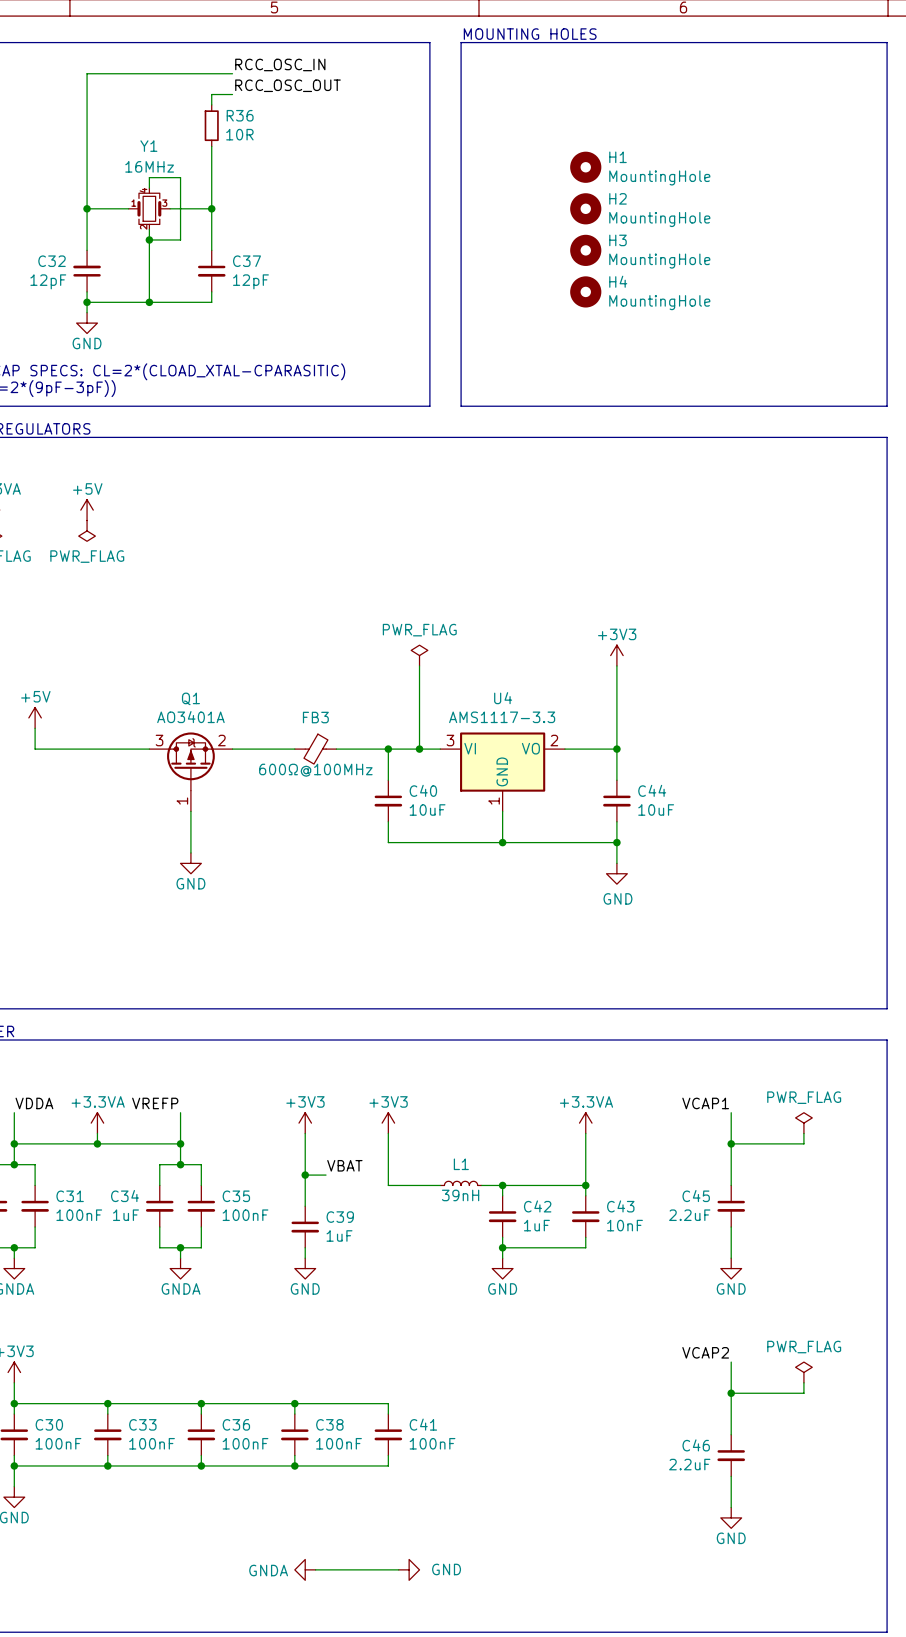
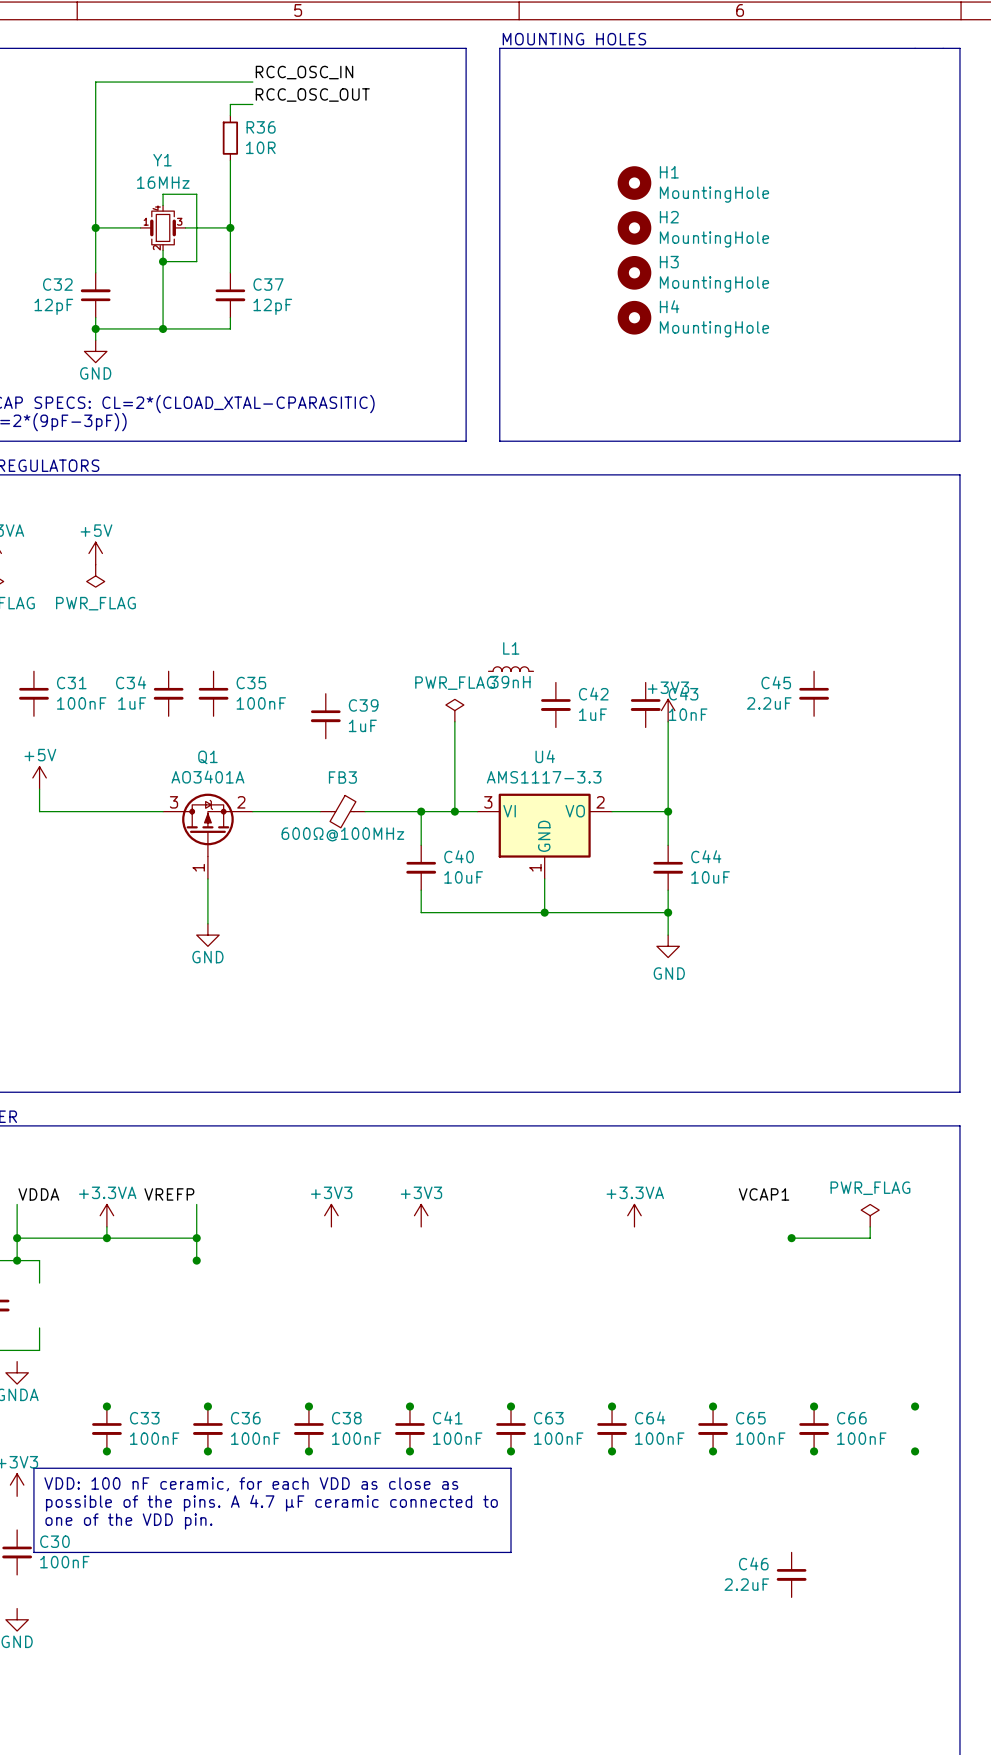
wire: (731, 1112) (731, 1185) -> none
wire: (305, 1133) (305, 1206) -> none
wire: (388, 1133) (388, 1185) (440, 1185) -> none
wire: (585, 1133) (585, 1195) -> none
label: VBAT (344, 1165) -> none
wire: (305, 1175) (326, 1175) -> none
junction: (305, 1175) -> none
L1 position: (461, 1183) -> (511, 669)
wire: (159, 1185) (159, 1164) (201, 1164) (201, 1185) -> none
wire: (481, 1185) (585, 1185) -> none
wire: (502, 1185) (502, 1195) -> none
junction: (502, 1185) -> none
junction: (585, 1185) -> none
C31 position: (35, 1206) -> (33, 693)
C34 position: (159, 1206) -> (168, 693)
C35 position: (201, 1206) -> (213, 693)
C45 position: (731, 1206) -> (814, 693)
C42 position: (502, 1216) -> (555, 704)
C43 position: (585, 1216) -> (645, 704)
wire: (159, 1227) (159, 1247) (201, 1247) (201, 1227) -> none
C39 position: (305, 1227) -> (325, 716)
wire: (731, 1227) (731, 1258) -> none
wire: (502, 1237) (502, 1258) -> none
wire: (585, 1237) (585, 1247) (502, 1247) -> none
wire: (14, 1247) (14, 1258) -> none
junction: (14, 1247) -> none
wire: (180, 1247) (180, 1258) -> none
junction: (180, 1247) -> none
wire: (305, 1247) (305, 1258) -> none
junction: (502, 1247) -> none
power symbol: GNDA (180, 1268) -> none
power symbol: GND (305, 1268) -> none
power symbol: GND (502, 1268) -> none
power symbol: GND (731, 1268) -> none
junction: none -> (106, 1406)
junction: none -> (207, 1406)
junction: none -> (308, 1406)
junction: none -> (409, 1406)
junction: none -> (511, 1406)
junction: none -> (612, 1406)
junction: none -> (713, 1406)
junction: none -> (814, 1406)
junction: none -> (915, 1406)
C63: none -> 100nF (511, 1428)
C64: none -> 100nF (612, 1428)
C65: none -> 100nF (713, 1428)
C66: none -> 100nF (814, 1428)
junction: none -> (106, 1451)
junction: none -> (207, 1451)
junction: none -> (308, 1451)
junction: none -> (409, 1451)
junction: none -> (511, 1451)
junction: none -> (612, 1451)
junction: none -> (713, 1451)
junction: none -> (814, 1451)
junction: none -> (915, 1451)
label: VCAP2 (705, 1352) -> none
line: none -> (33, 1468) (511, 1468) (511, 1552) (33, 1552) (33, 1468)
wire: (731, 1362) (731, 1434) -> none
text: none -> VDD: 100 nF ceramic, for each VDD as close as (251, 1484)
power symbol: PWR_FLAG (803, 1372) -> none
wire: (14, 1382) (14, 1414) -> none
wire: (803, 1382) (803, 1393) (731, 1393) -> none
text: none -> possible of the pins. A 4.7 μF ceramic connected to (271, 1503)
junction: (731, 1393) -> none
wire: (14, 1403) (388, 1403) (388, 1414) -> none
junction: (14, 1403) -> none
wire: (107, 1403) (107, 1414) -> none
junction: (107, 1403) -> none
wire: (201, 1403) (201, 1414) -> none
junction: (201, 1403) -> none
wire: (294, 1403) (294, 1414) -> none
junction: (294, 1403) -> none
text: none -> one of the VDD pin. (128, 1521)
C33 position: (107, 1434) -> (106, 1428)
C36 position: (201, 1434) -> (207, 1428)
C38 position: (294, 1434) -> (308, 1428)
C41 position: (388, 1434) -> (409, 1428)
wire: (14, 1455) (14, 1486) -> none
wire: (107, 1455) (107, 1465) -> none
wire: (201, 1455) (201, 1465) -> none
wire: (294, 1455) (294, 1465) -> none
wire: (388, 1455) (388, 1465) (14, 1465) -> none
junction: (14, 1465) -> none
junction: (107, 1465) -> none
junction: (201, 1465) -> none
junction: (294, 1465) -> none
wire: (731, 1476) (731, 1507) -> none
power symbol: GND (731, 1517) -> none
power symbol: GNDA (305, 1569) -> none
wire: (315, 1569) (398, 1569) -> none
power symbol: GND (409, 1569) -> none

